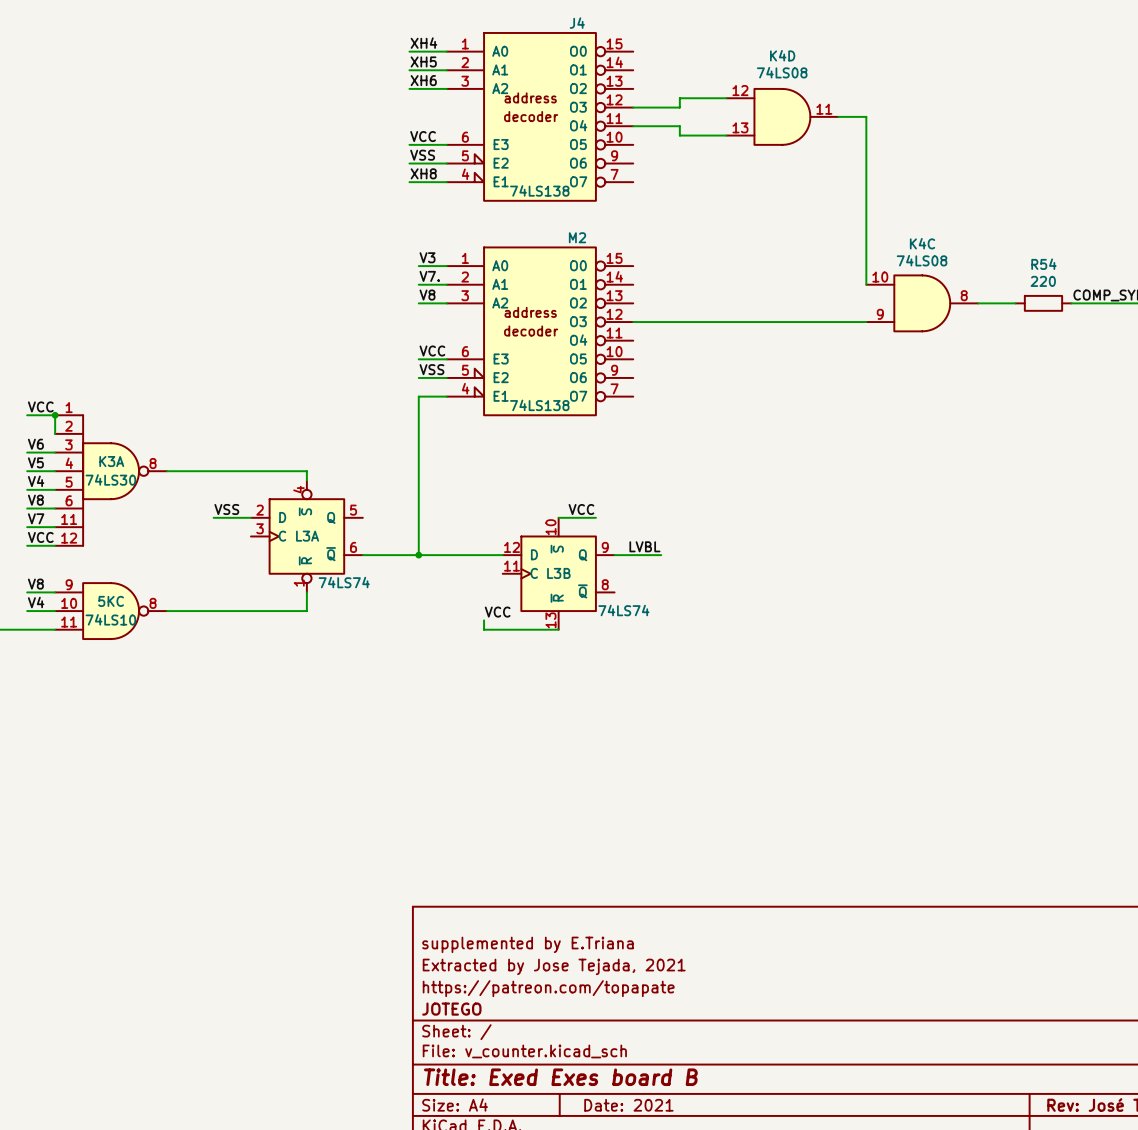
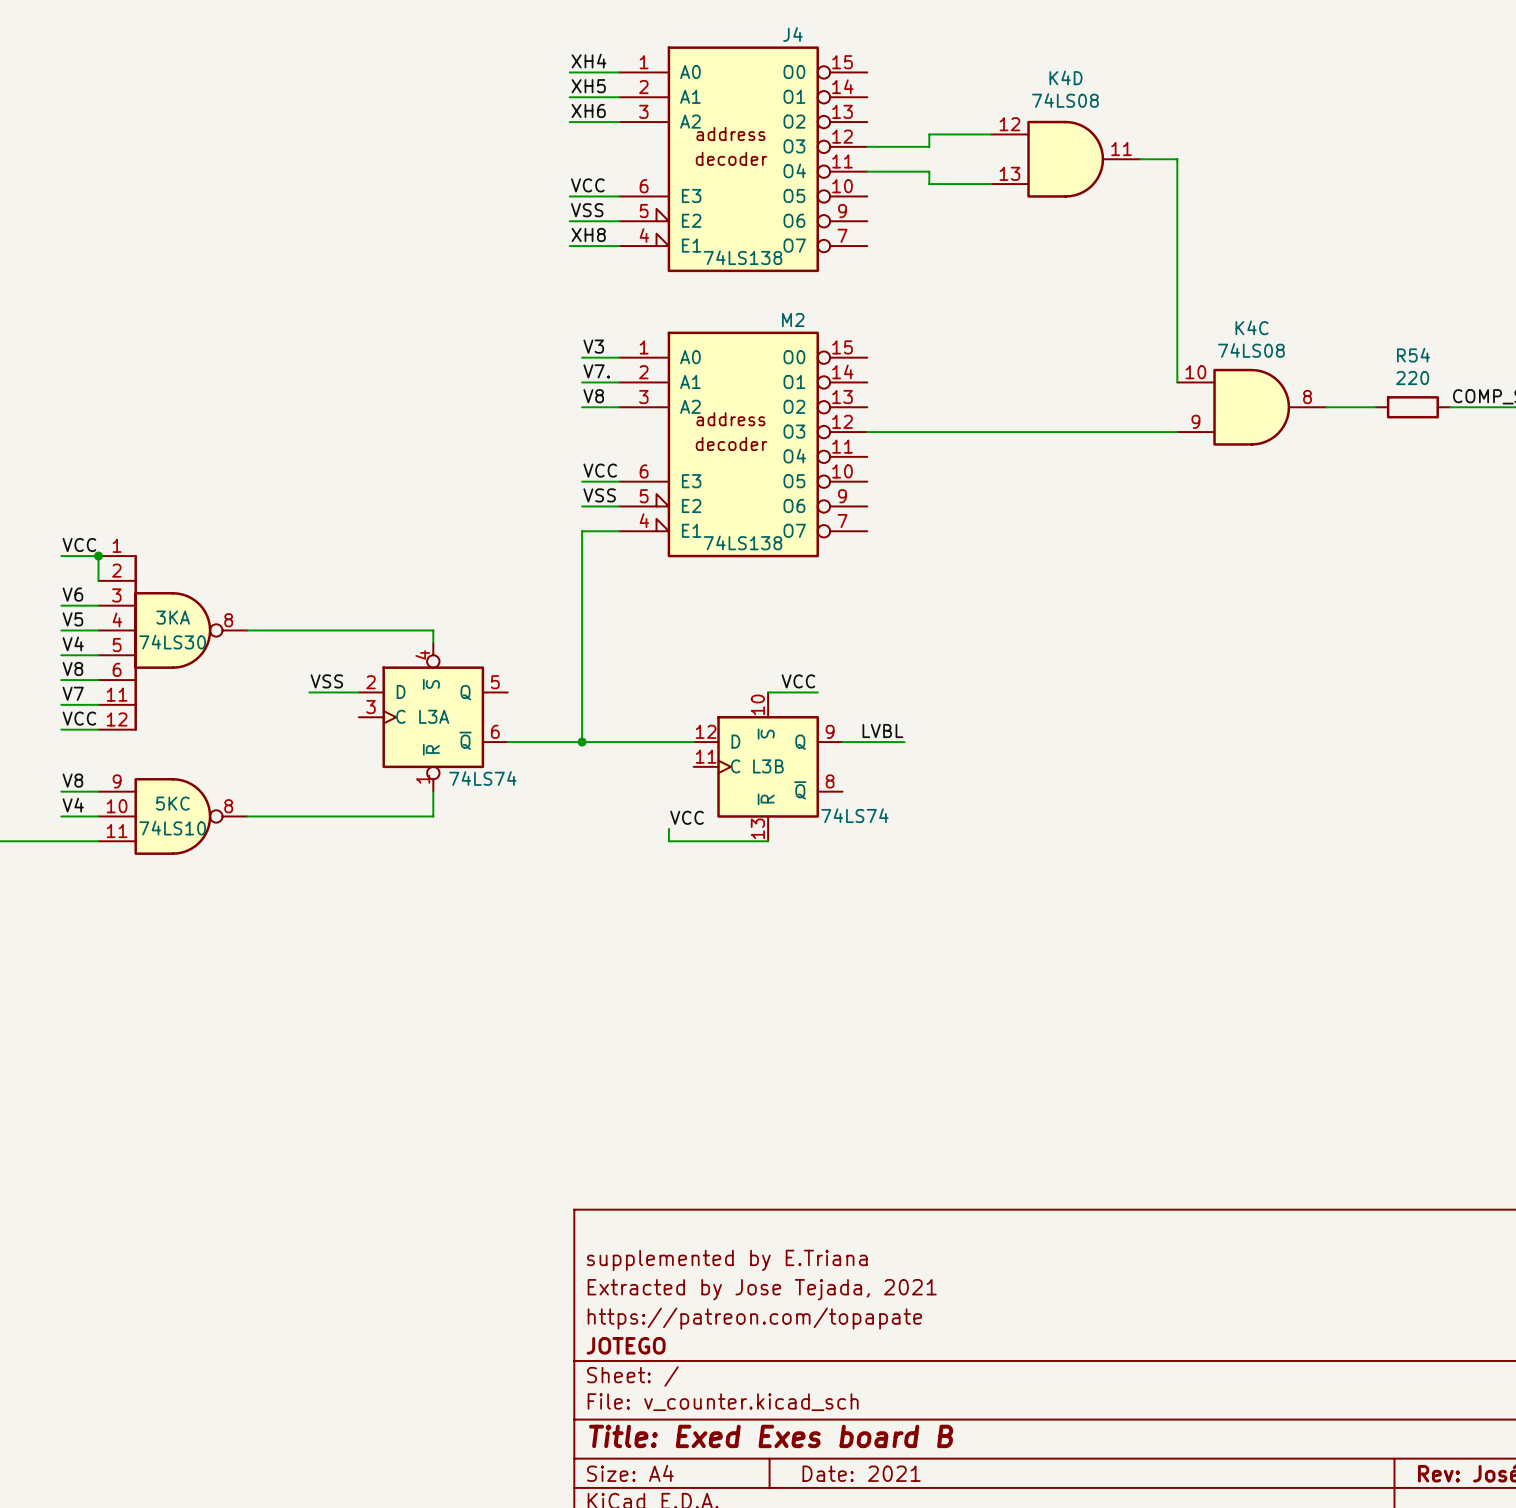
K3A name: K3A (111, 461) -> 3KA (173, 617)

